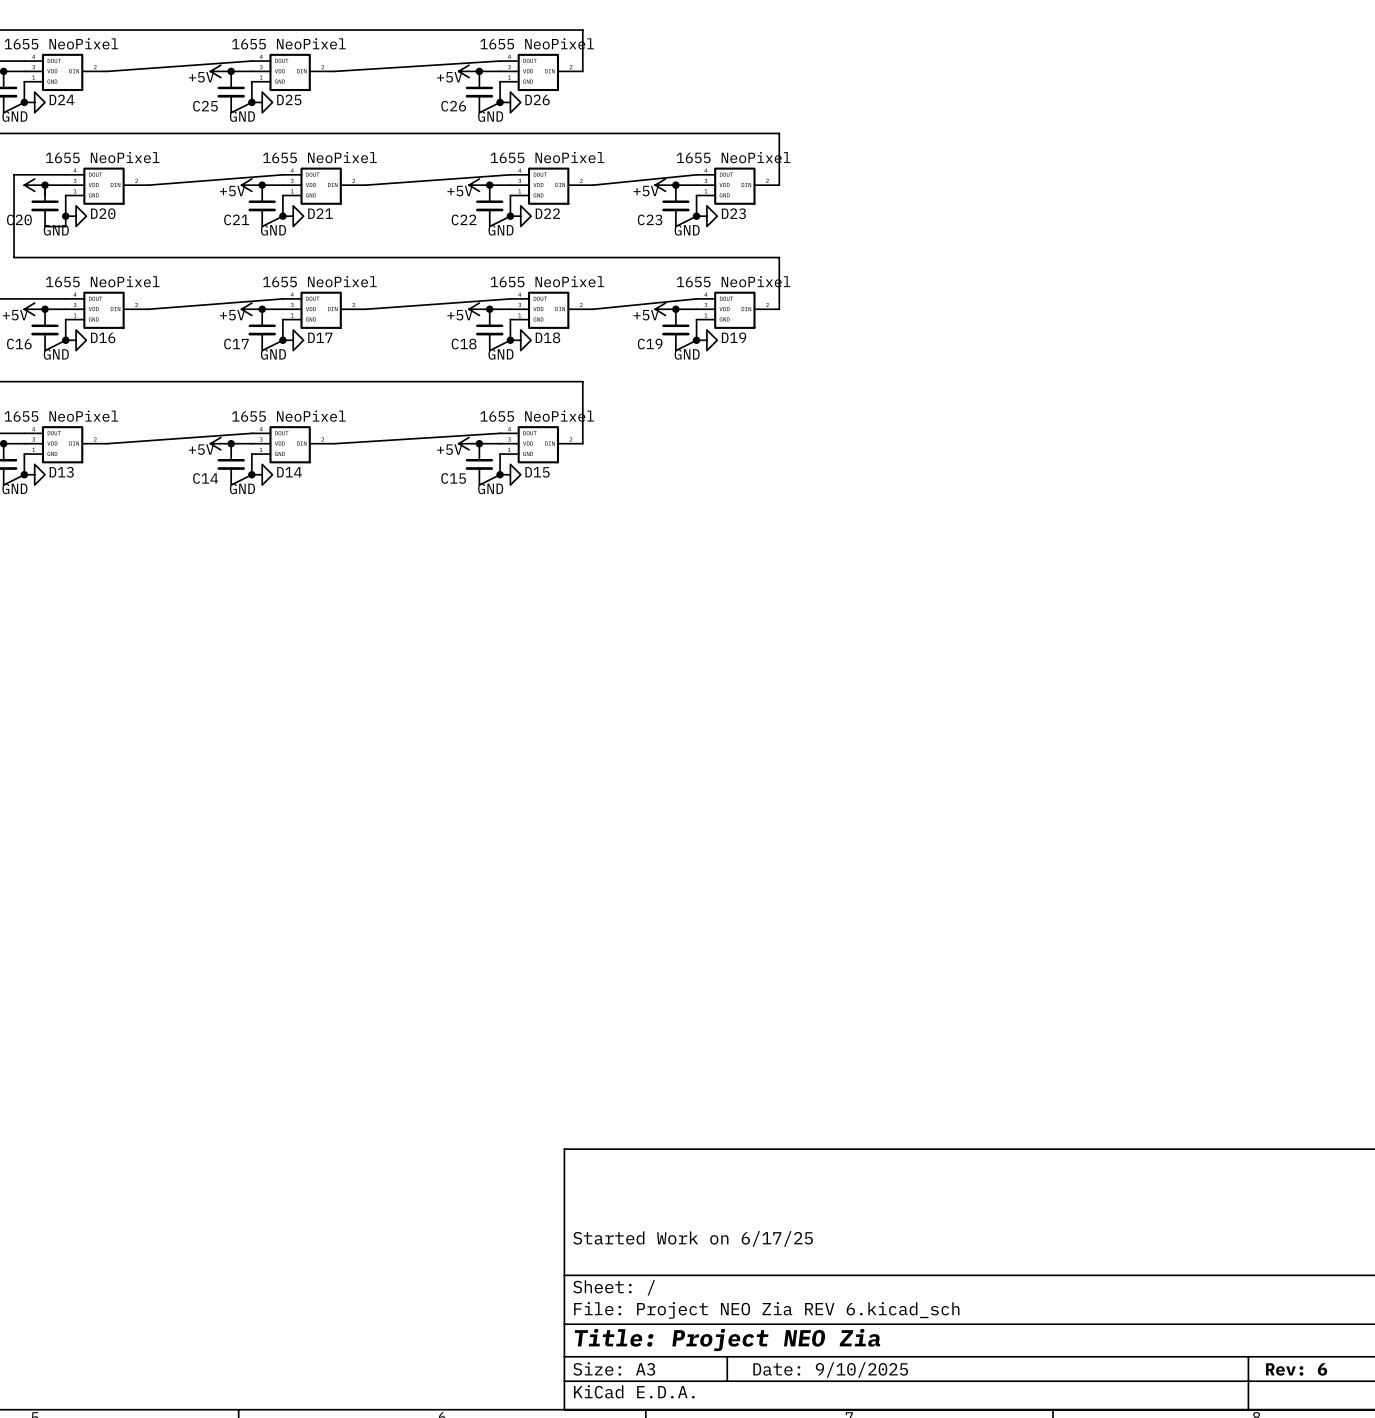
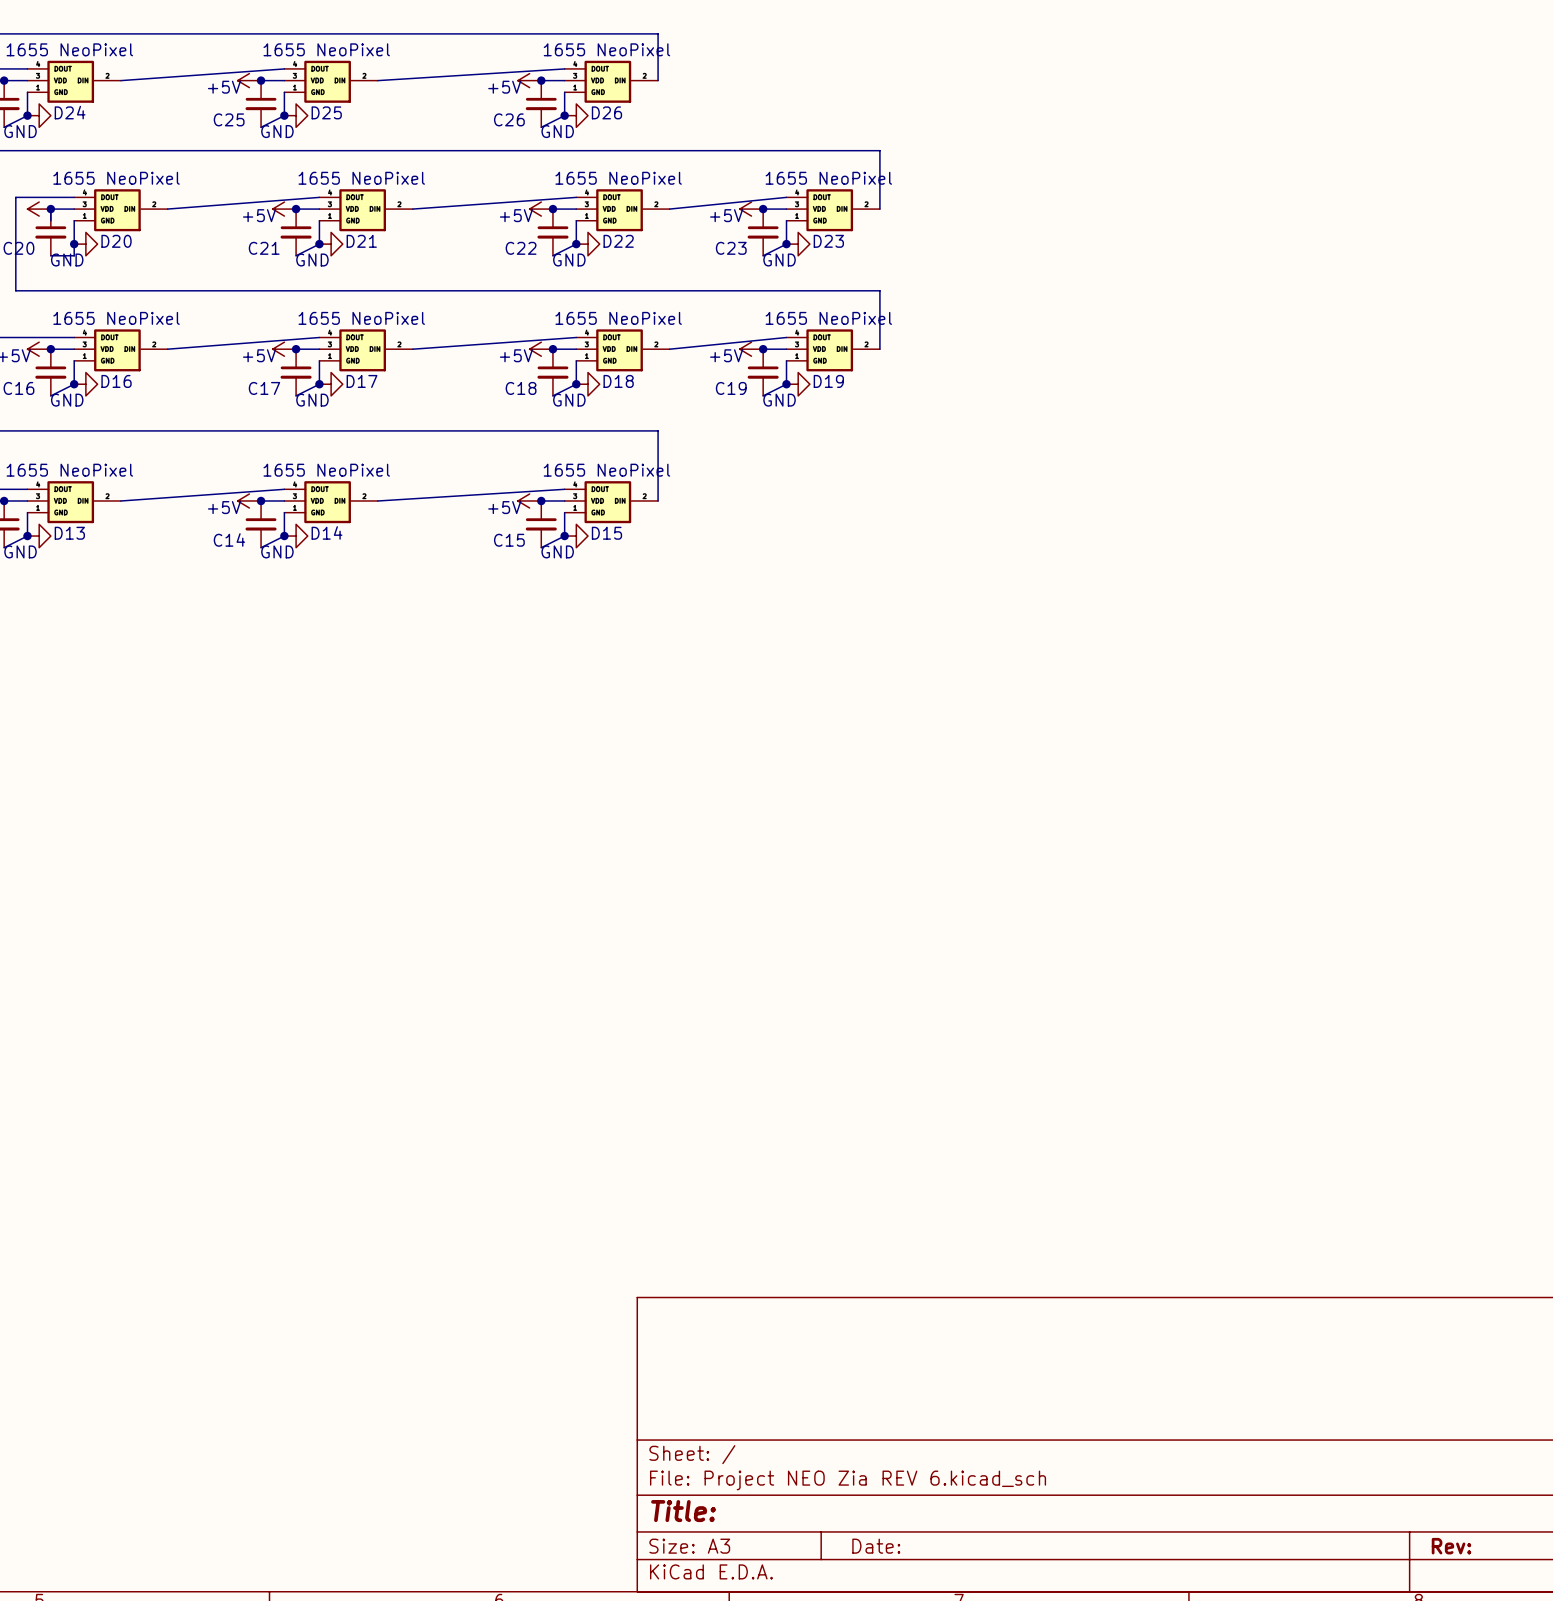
title block: Started Work on 6/17/25 (693, 1238) -> none
title block: Title: Project NEO Zia (727, 1339) -> Title: (683, 1511)
title block: Rev: 6 (1296, 1369) -> Rev: (1451, 1546)
title block: Date: 9/10/2025 (830, 1370) -> Date: (876, 1546)

